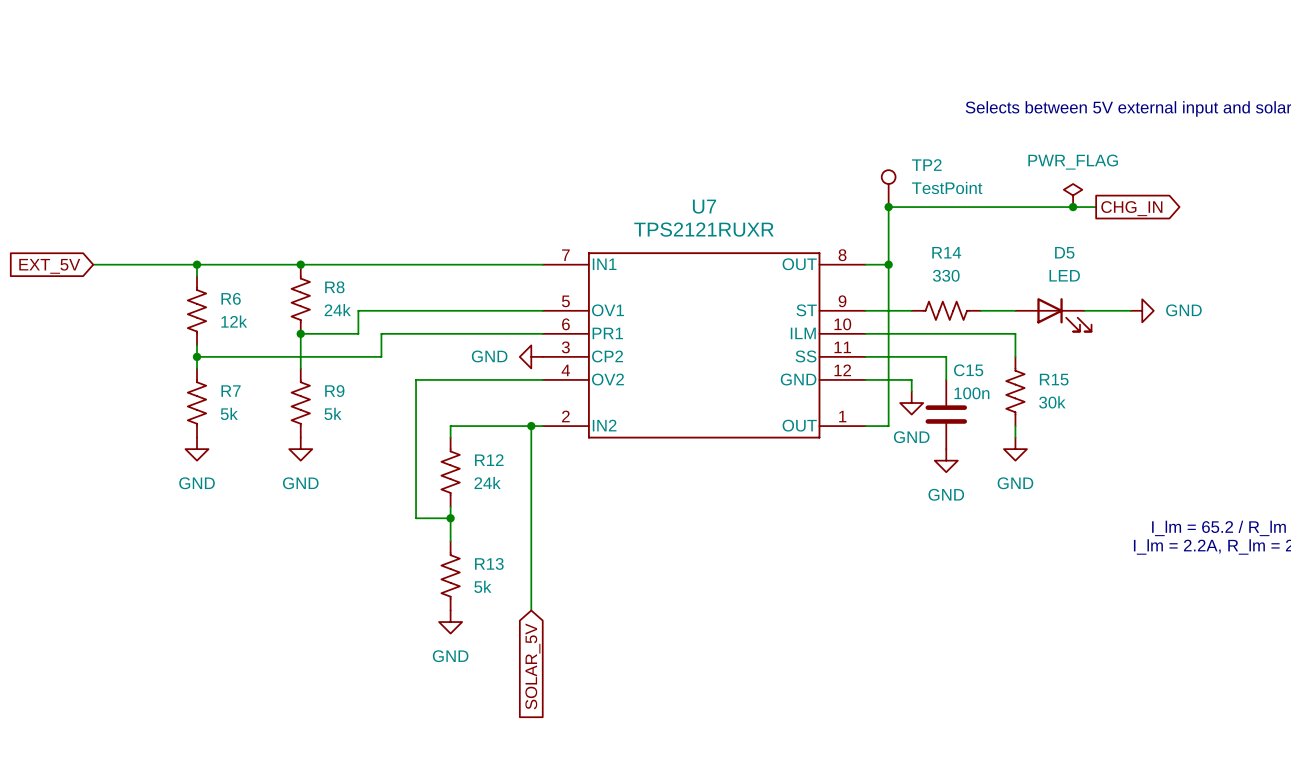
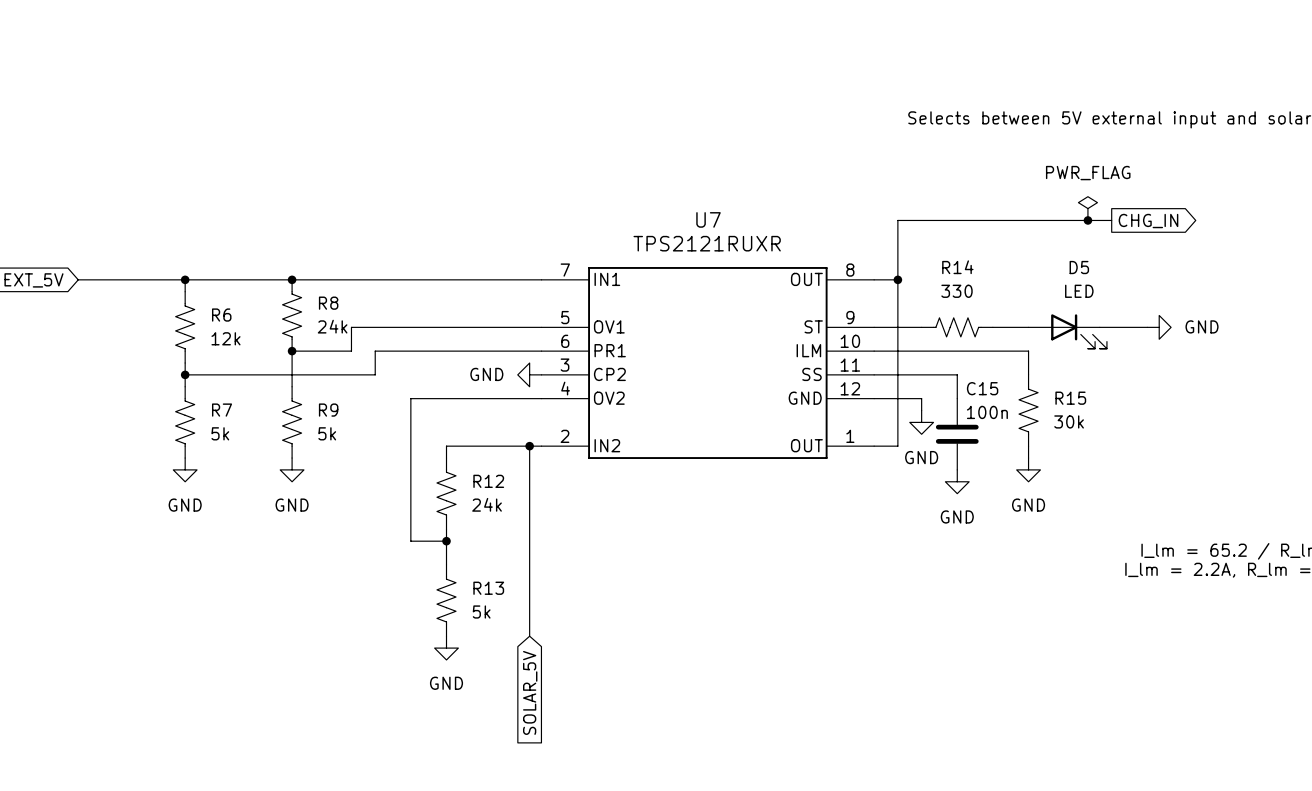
TP2: TestPoint (888, 188) -> none
junction: (888, 207) -> none

